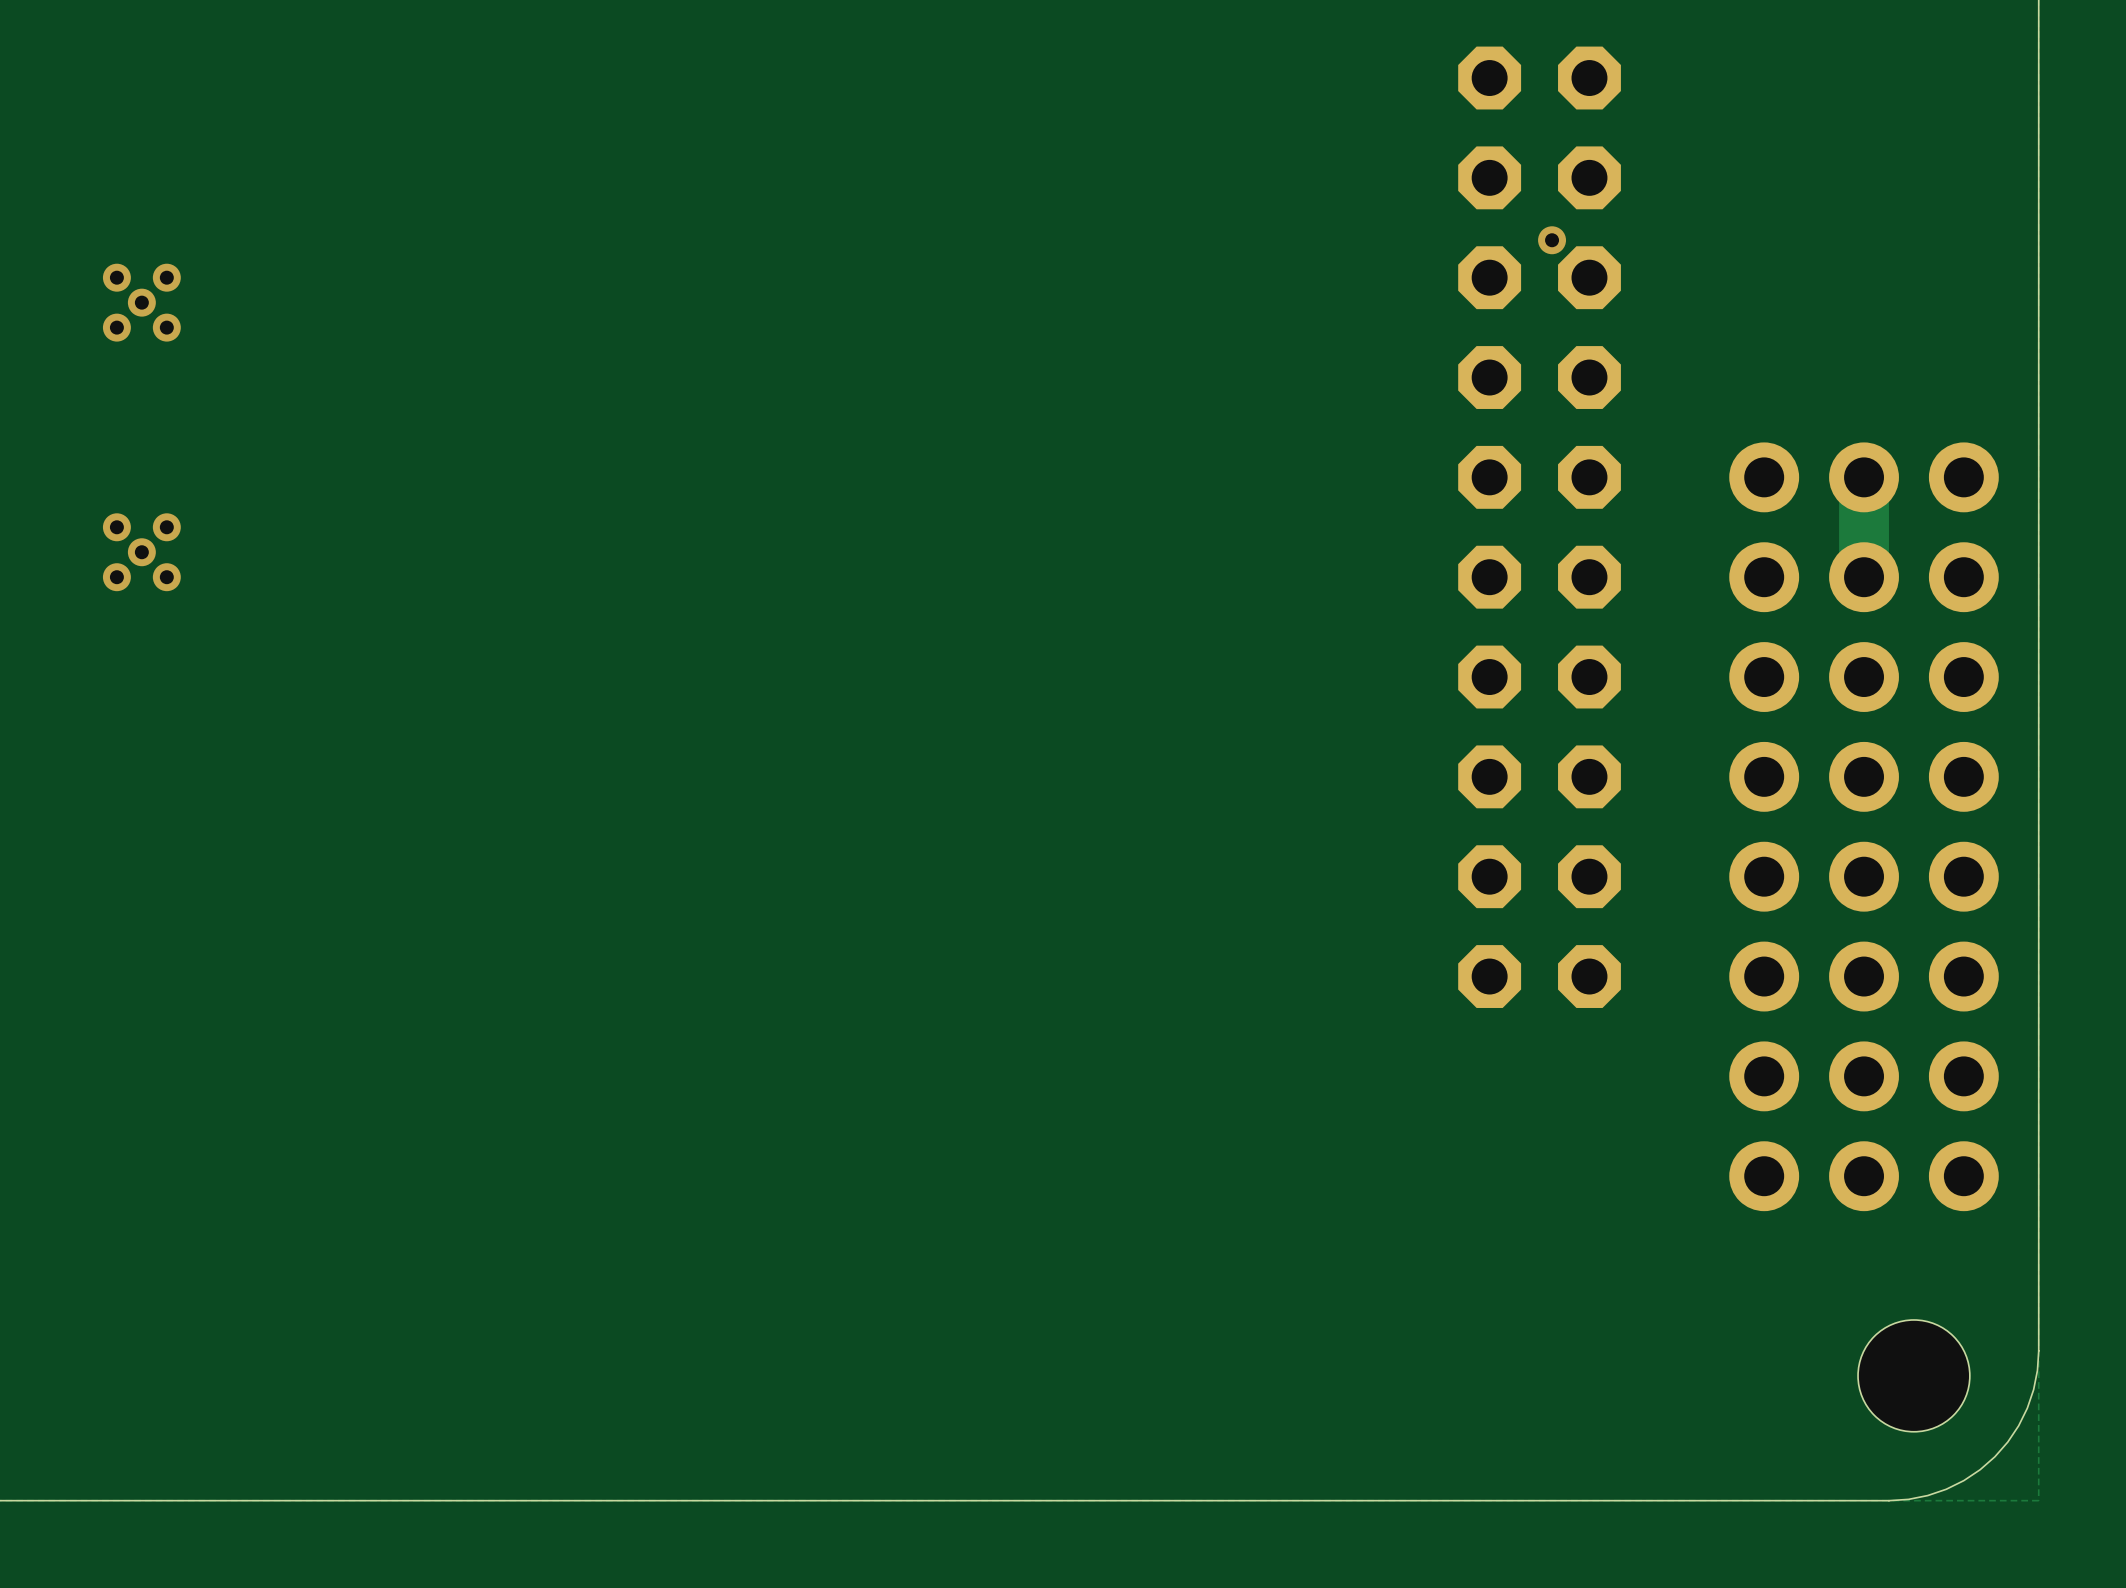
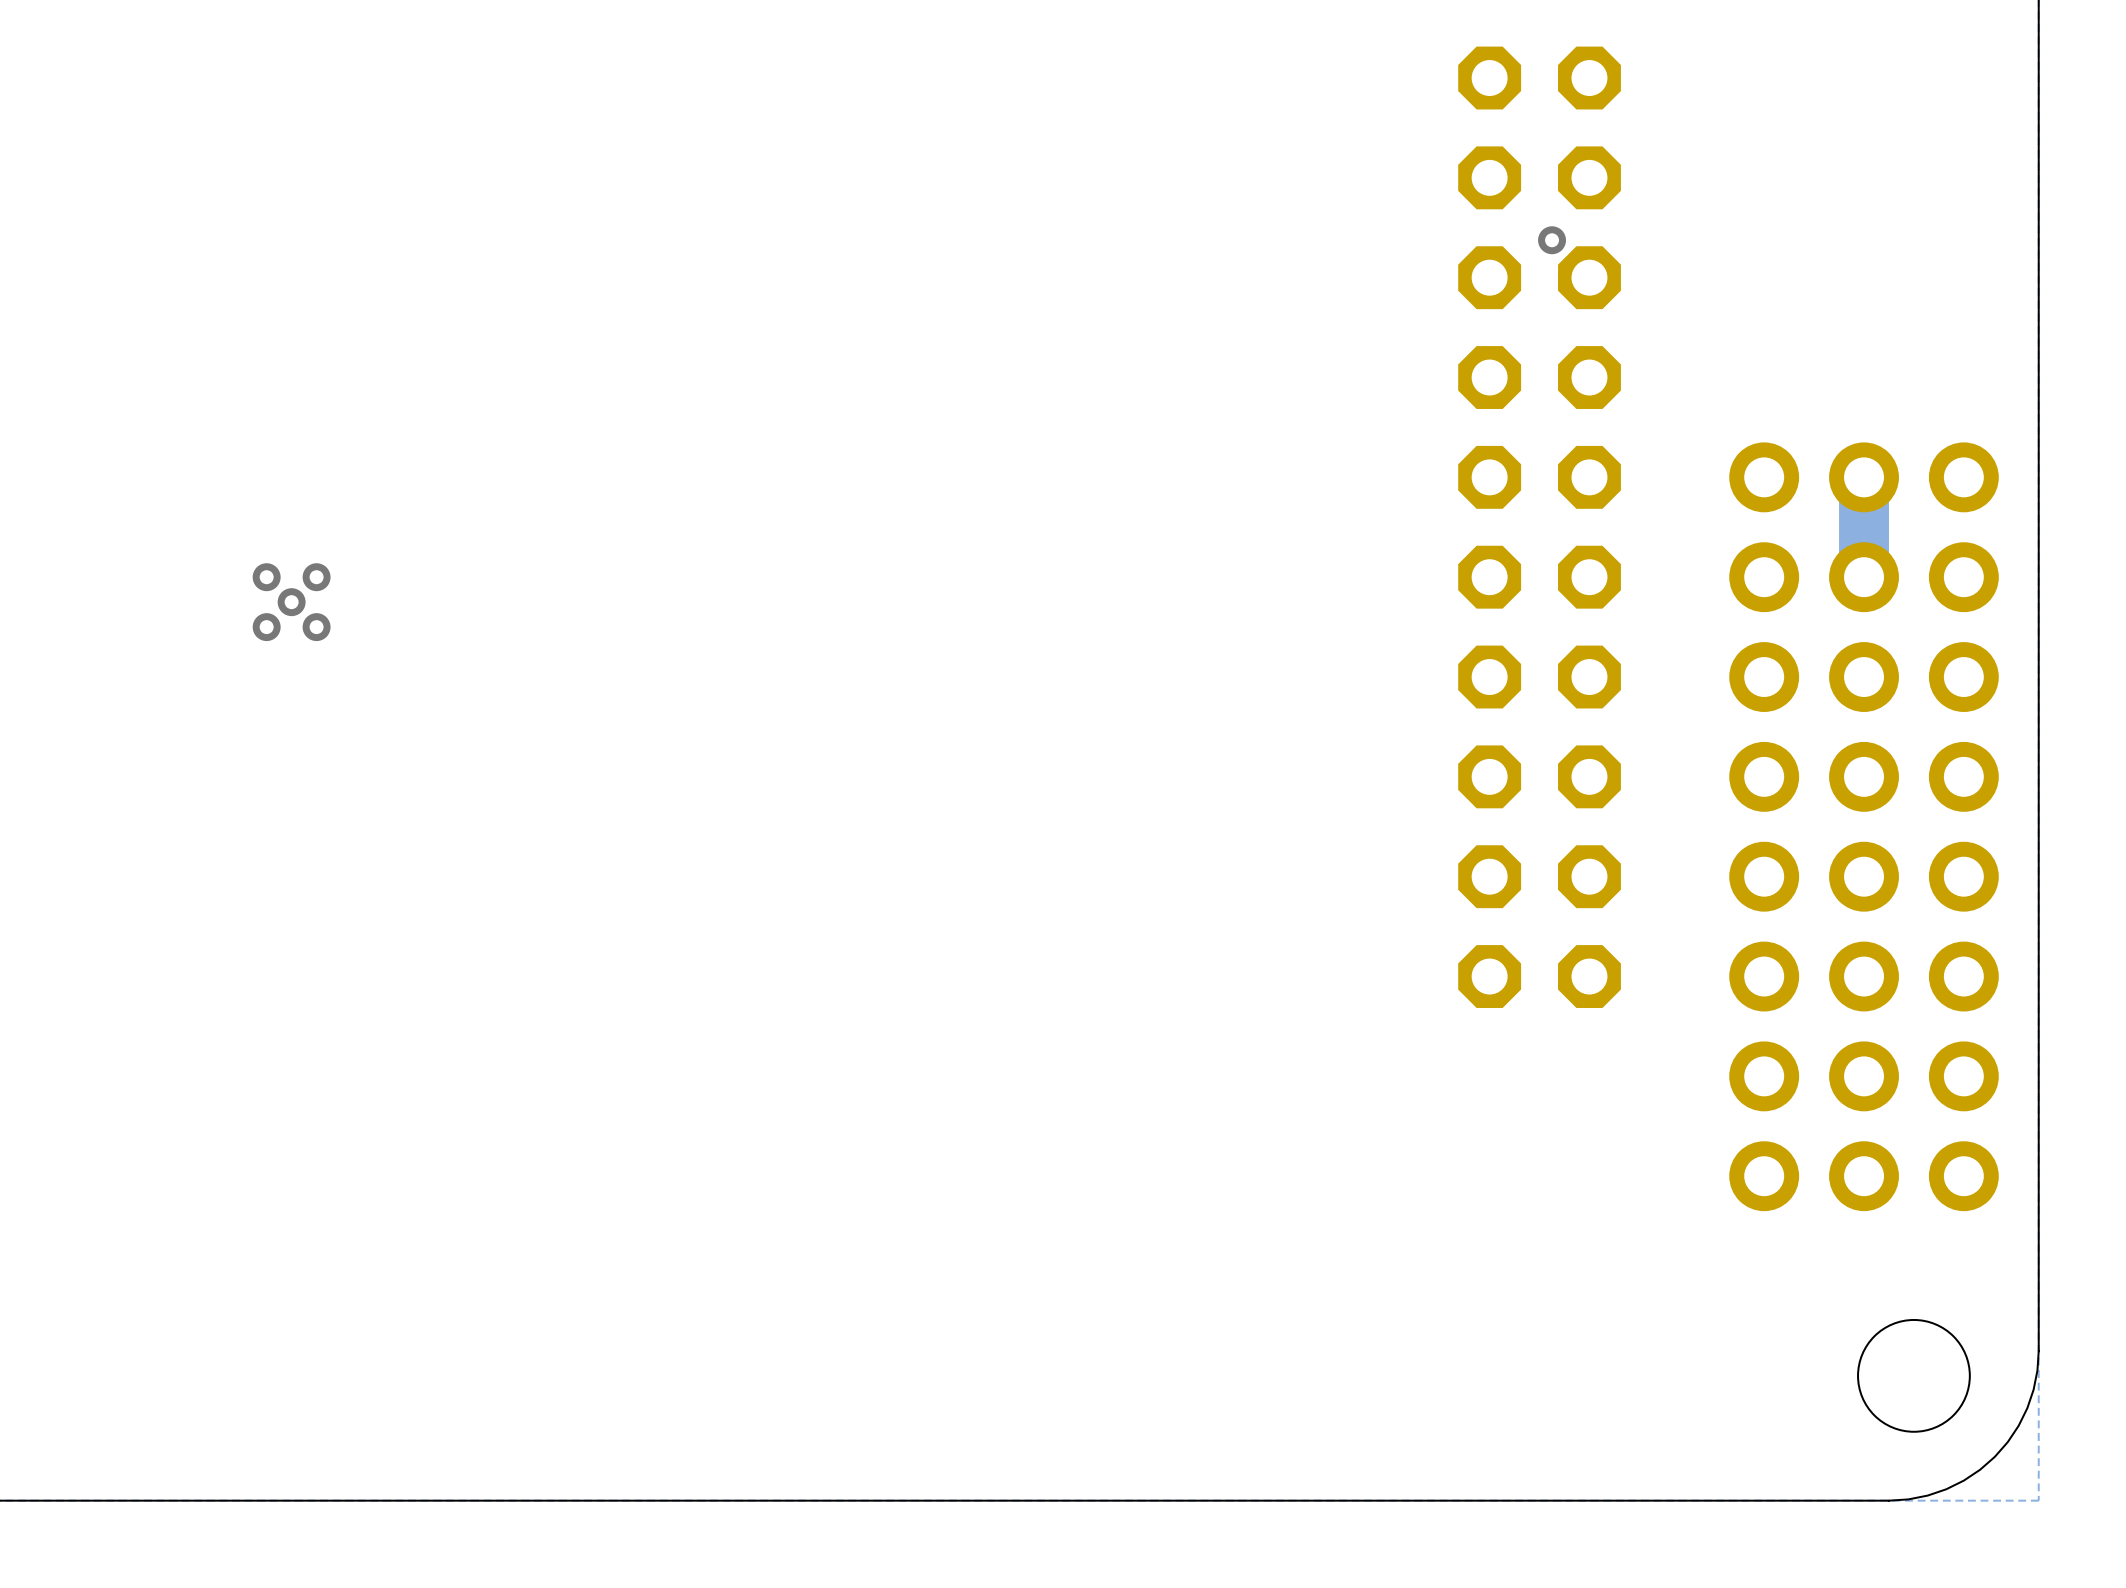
via: (116, 277) -> none
via: (166, 277) -> none
via: (141, 302) -> none
via: (116, 327) -> none
via: (166, 327) -> none
via: (116, 527) -> none
via: (166, 527) -> none
via: (141, 552) -> none
via: (116, 577) -> none
via: (166, 577) -> none
via: none -> (266, 577)
via: none -> (316, 577)
via: none -> (291, 602)
via: none -> (266, 627)
via: none -> (316, 627)

